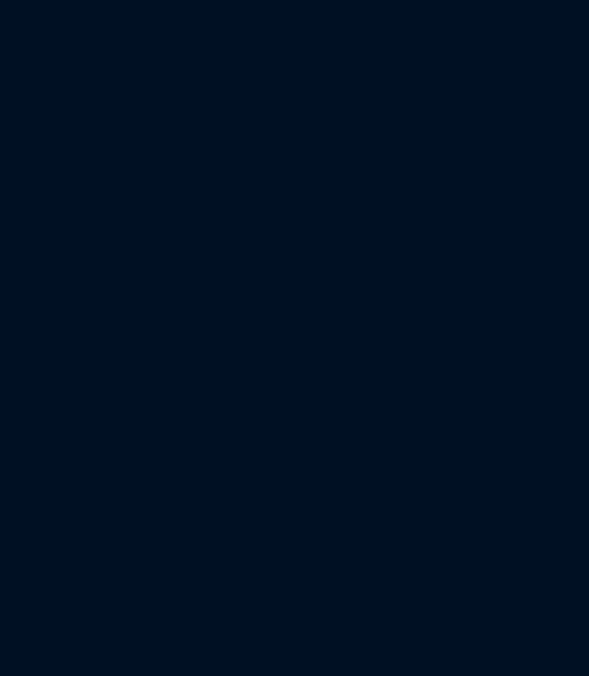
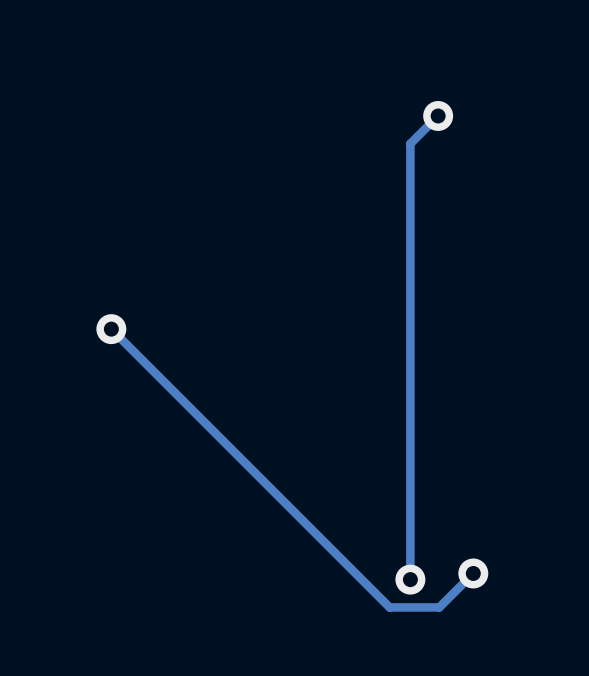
track: none -> (438, 115) (410, 143) (410, 579)
via: none -> (438, 115)
track: none -> (111, 329) (389, 607) (439, 607) (473, 573)
via: none -> (111, 329)
via: none -> (473, 573)
via: none -> (410, 579)

